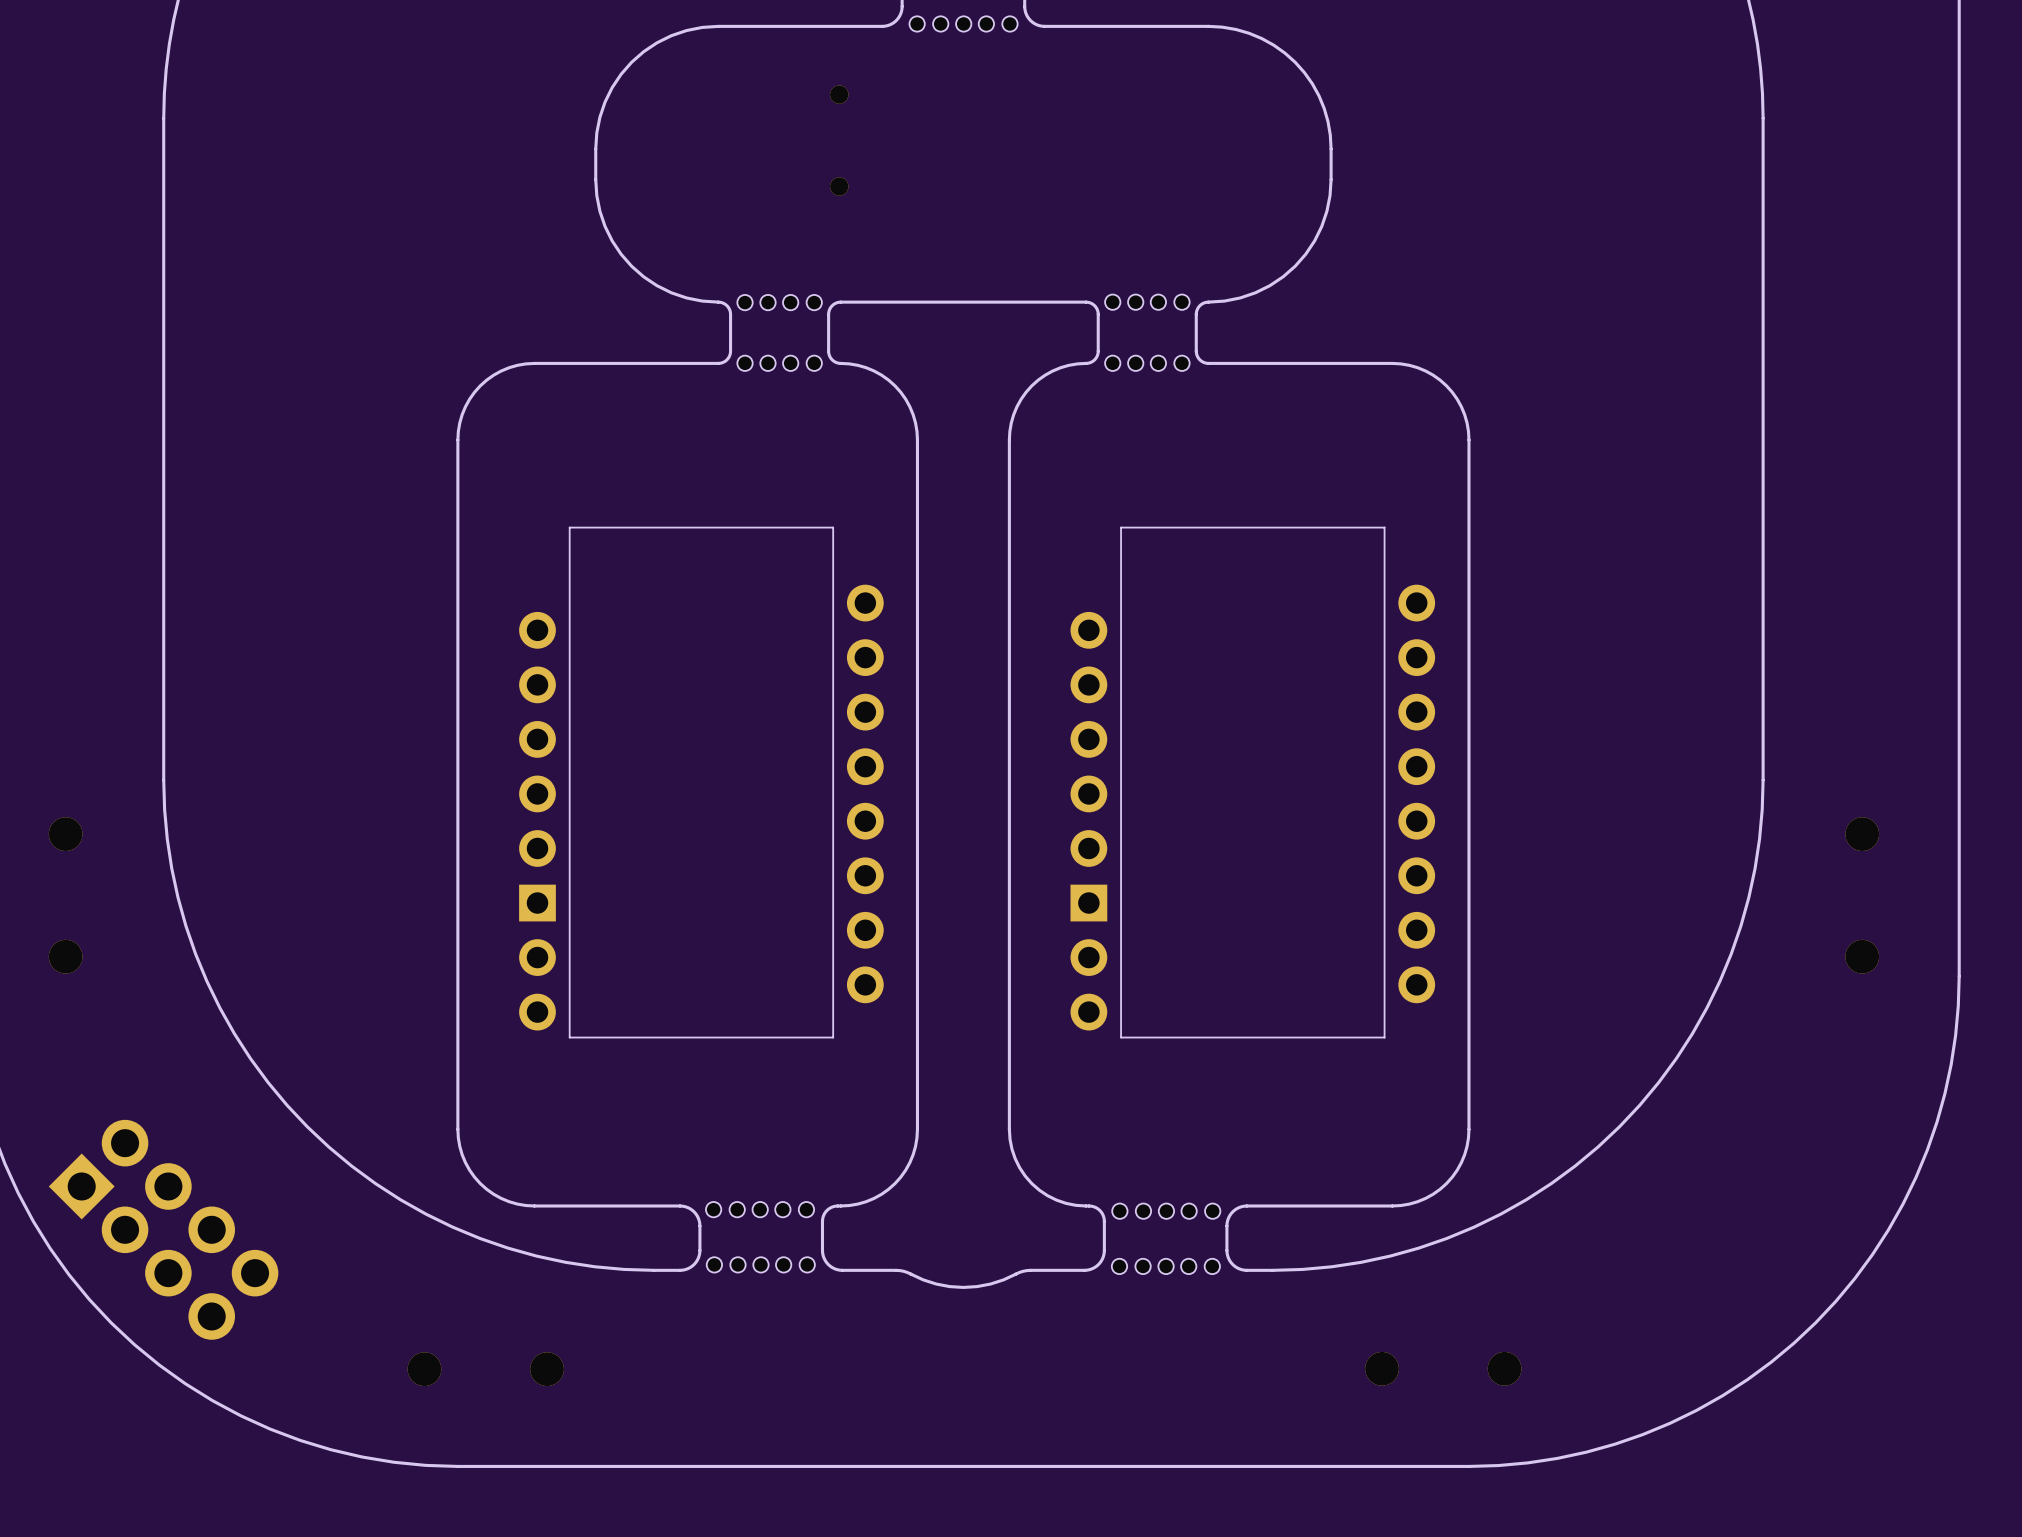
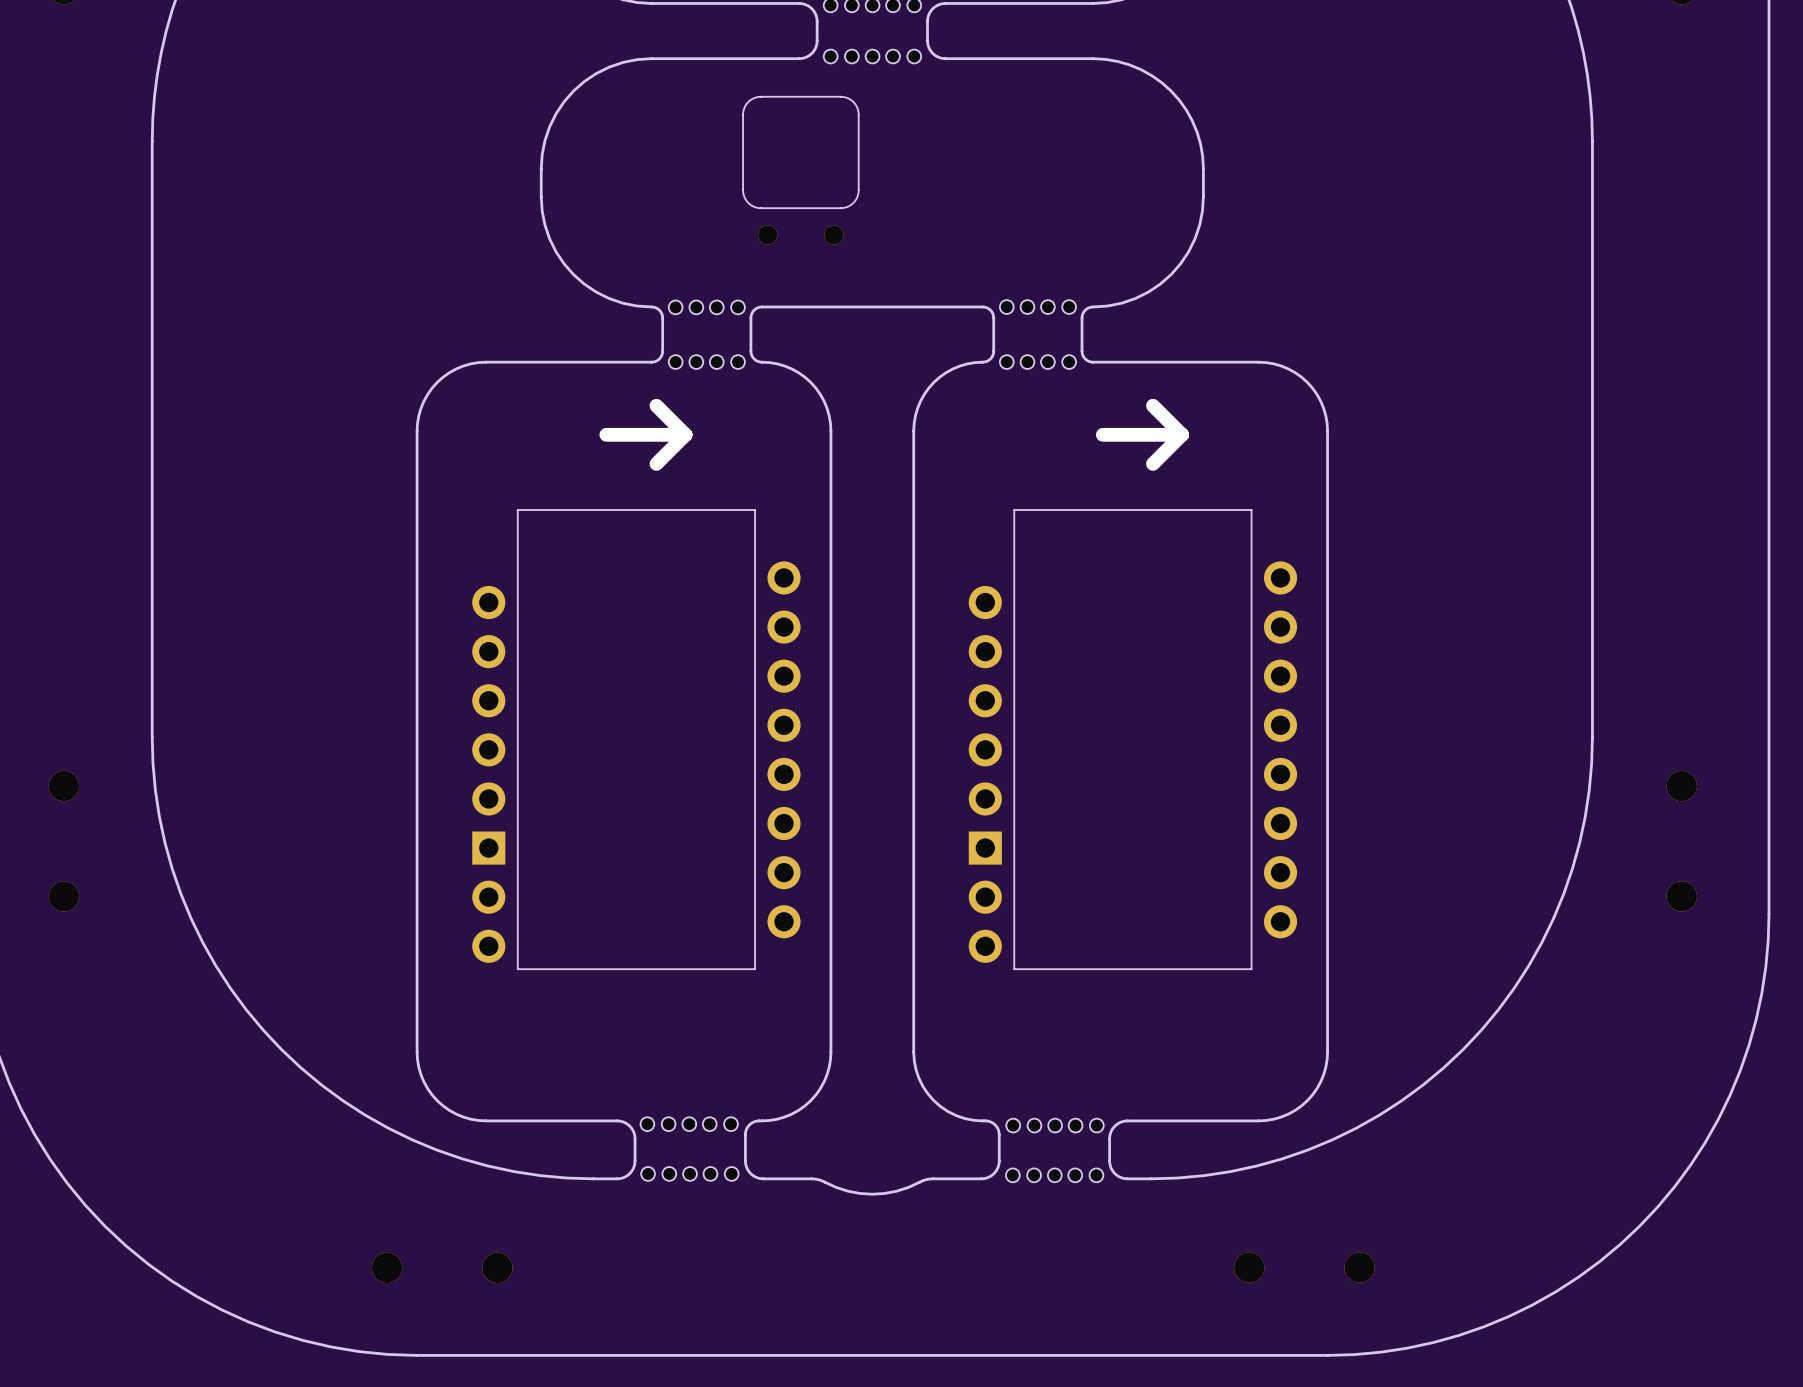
part: (839, 140) -> none
part: none -> (800, 170)
line: none -> (656, 405) (685, 434)
line: none -> (1152, 405) (1182, 434)
line: none -> (685, 434) (606, 434)
line: none -> (685, 434) (656, 463)
line: none -> (1182, 434) (1102, 434)
line: none -> (1182, 434) (1152, 463)
part: (163, 1229) -> none

